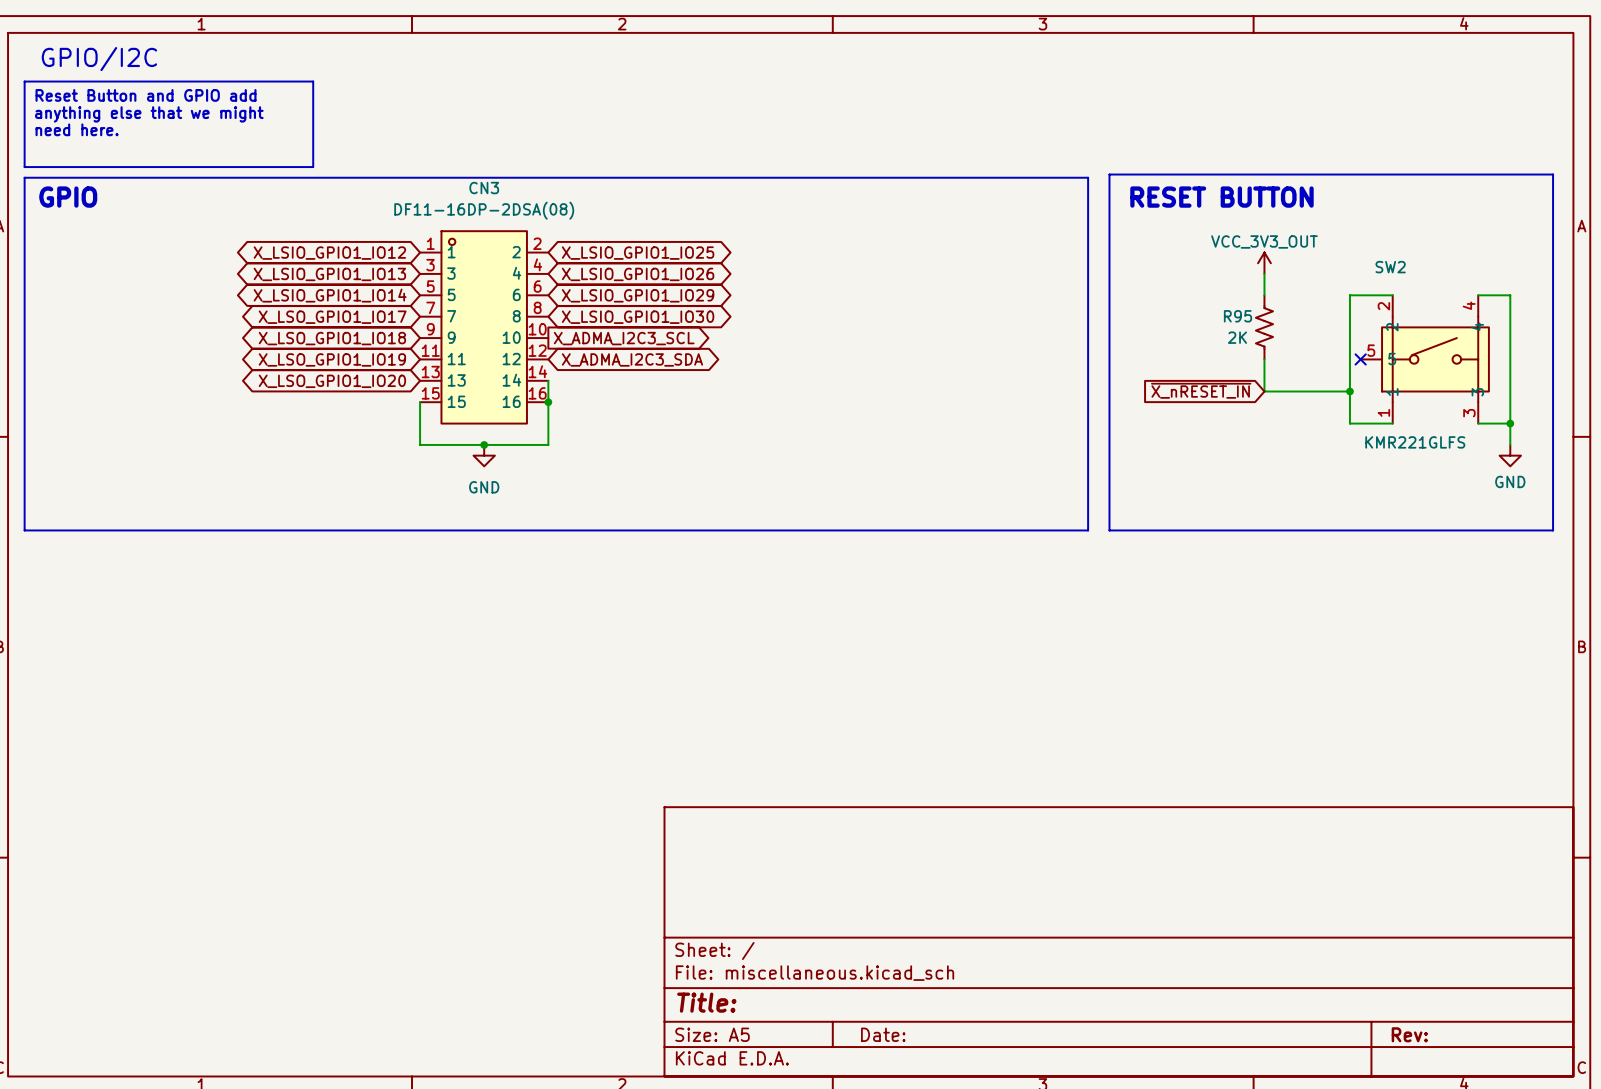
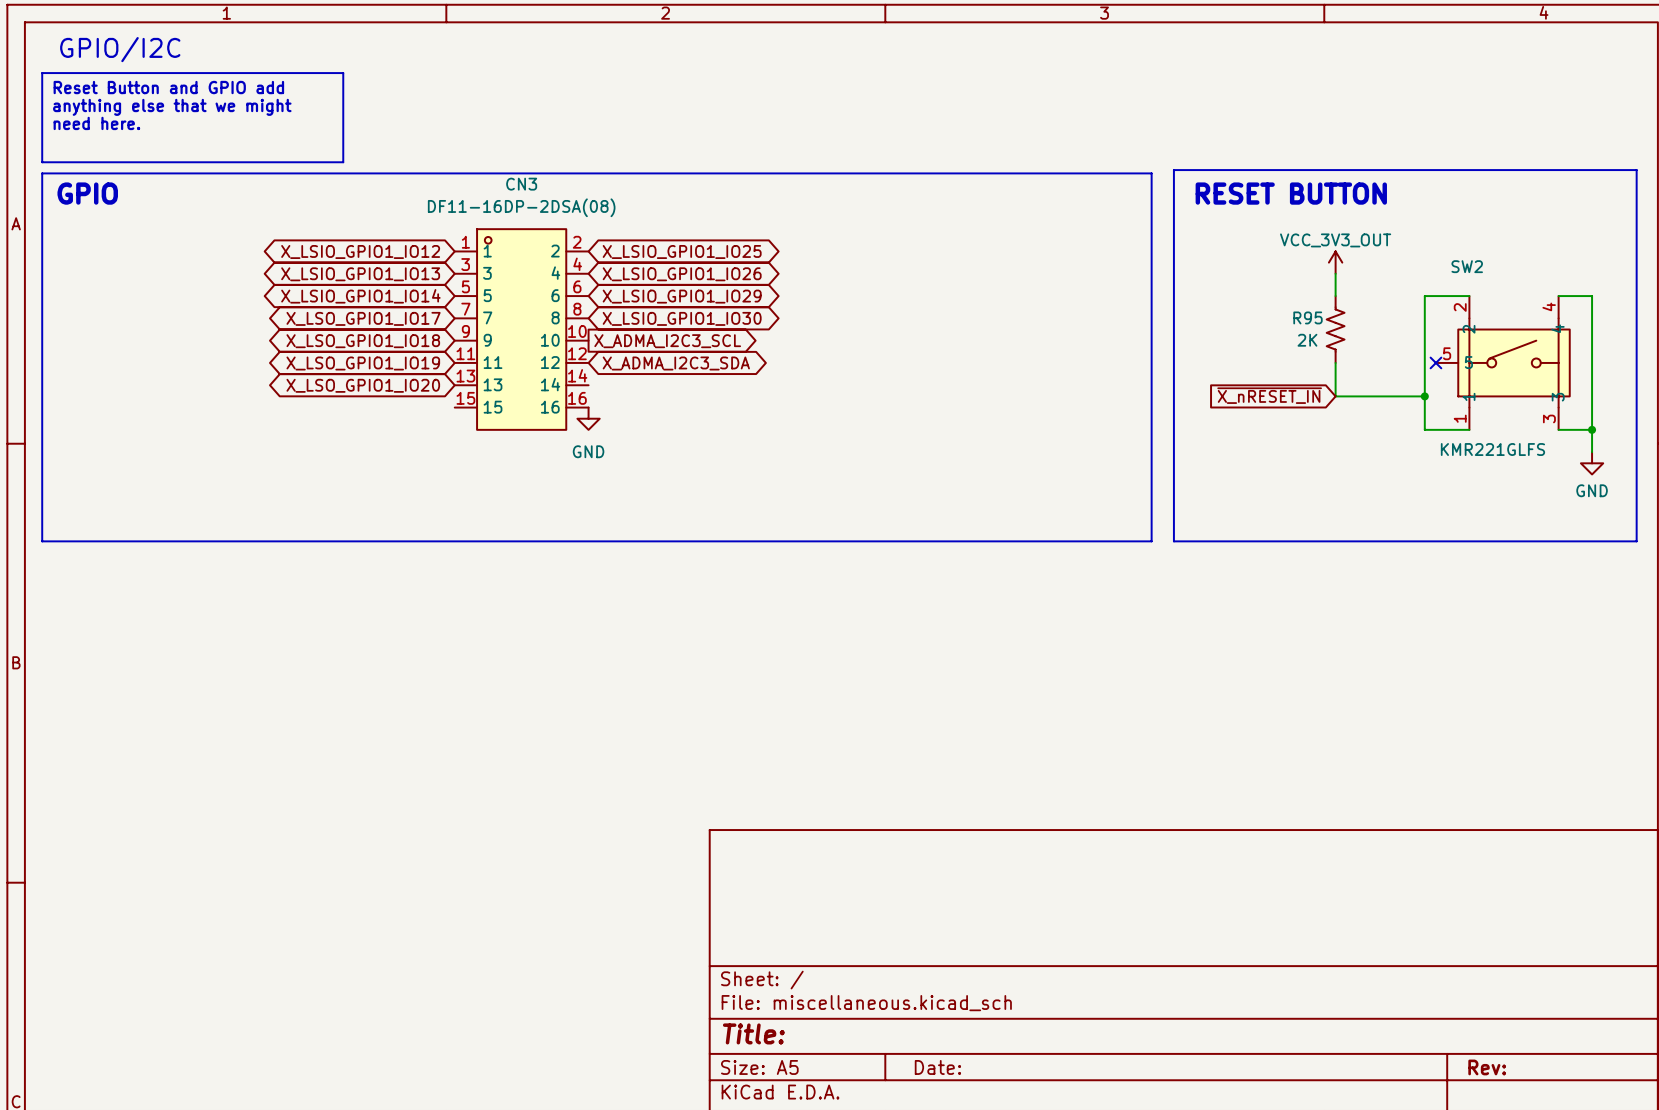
wire: (548, 380) (548, 444) (420, 444) (420, 402) -> none
junction: (548, 402) -> none
junction: (484, 444) -> none
power symbol position: GND (484, 455) -> GND (588, 418)

